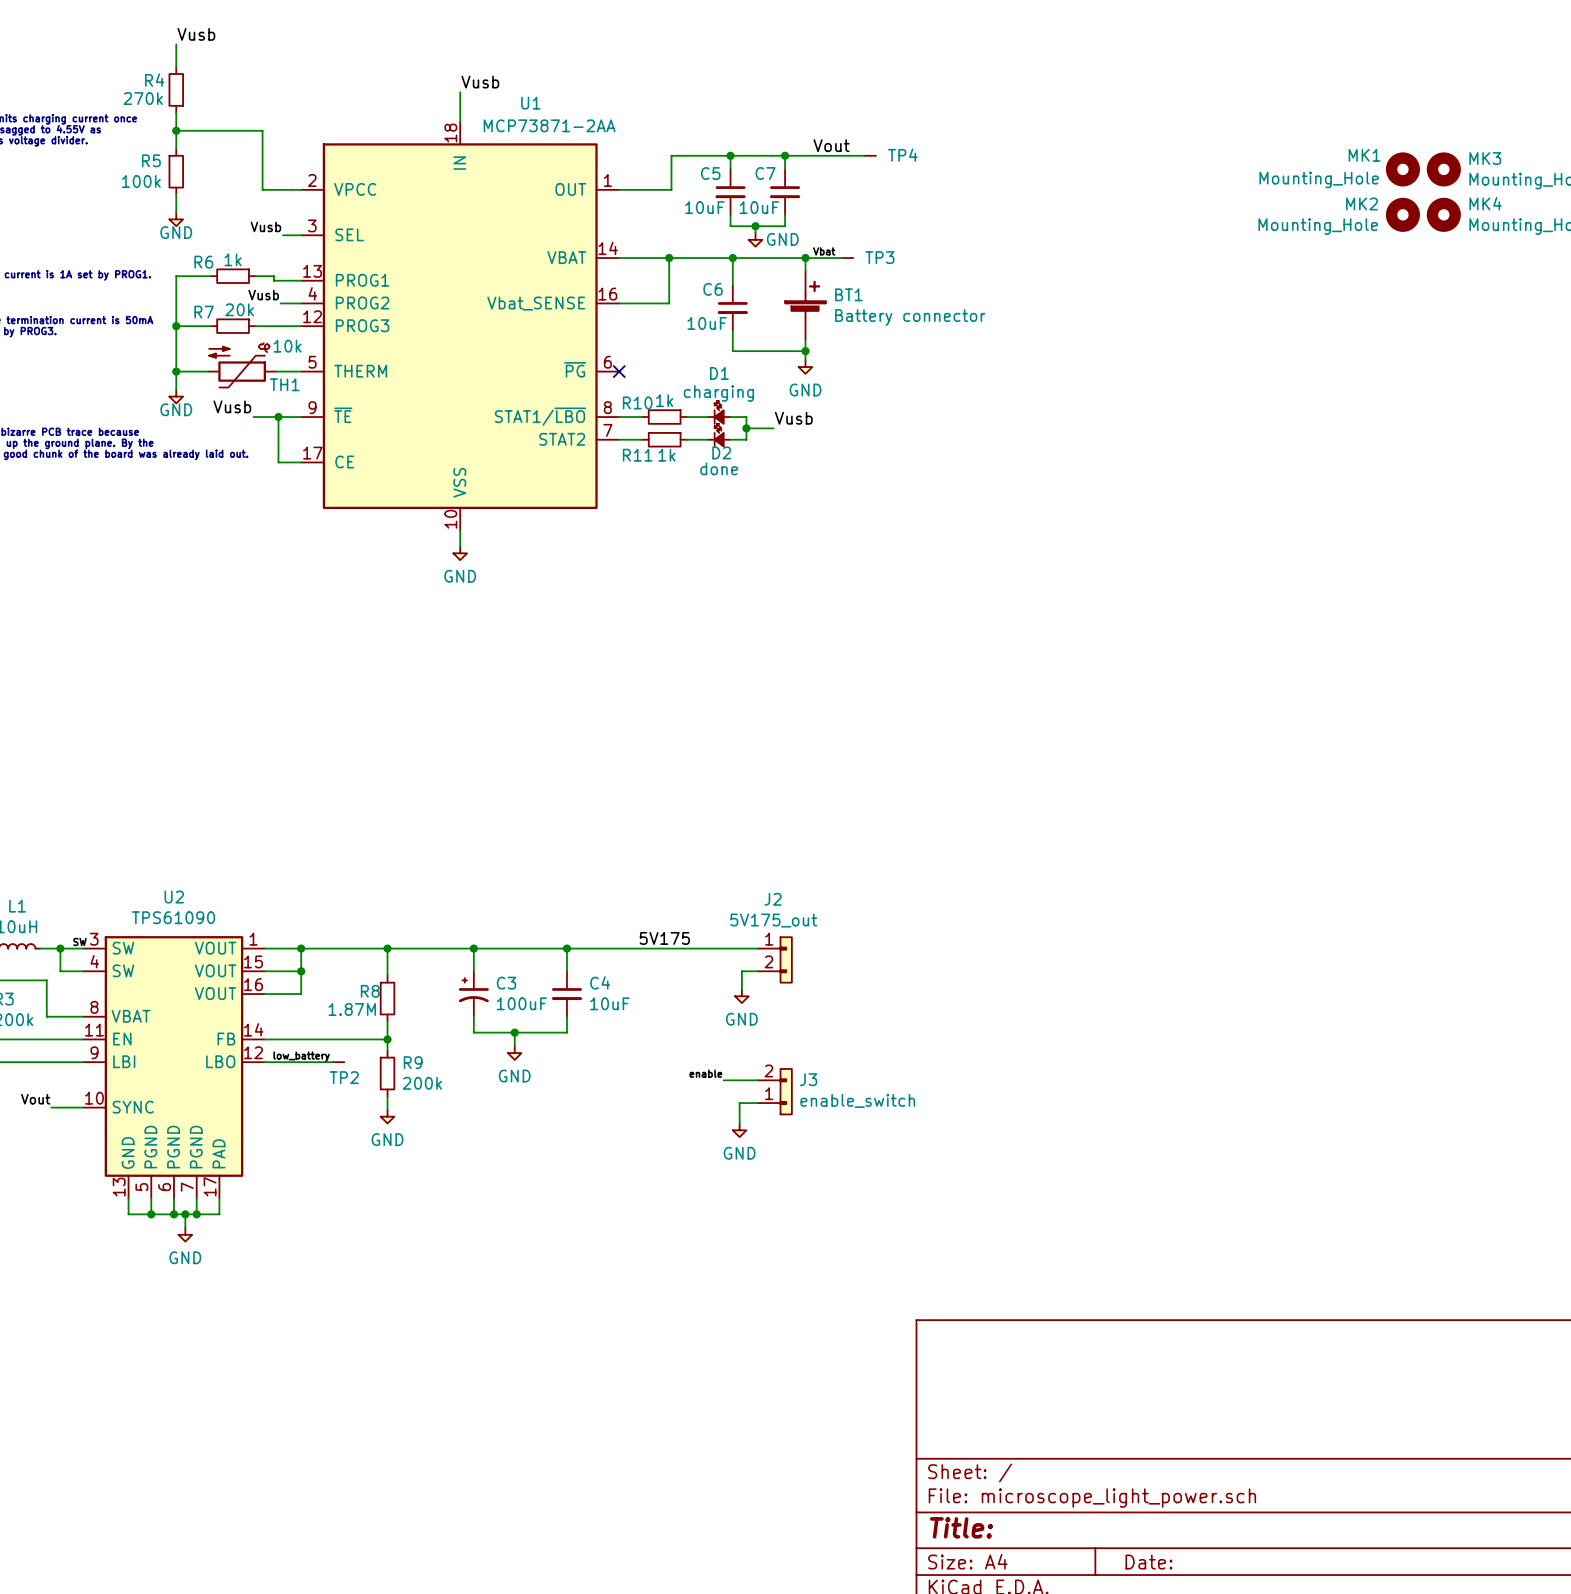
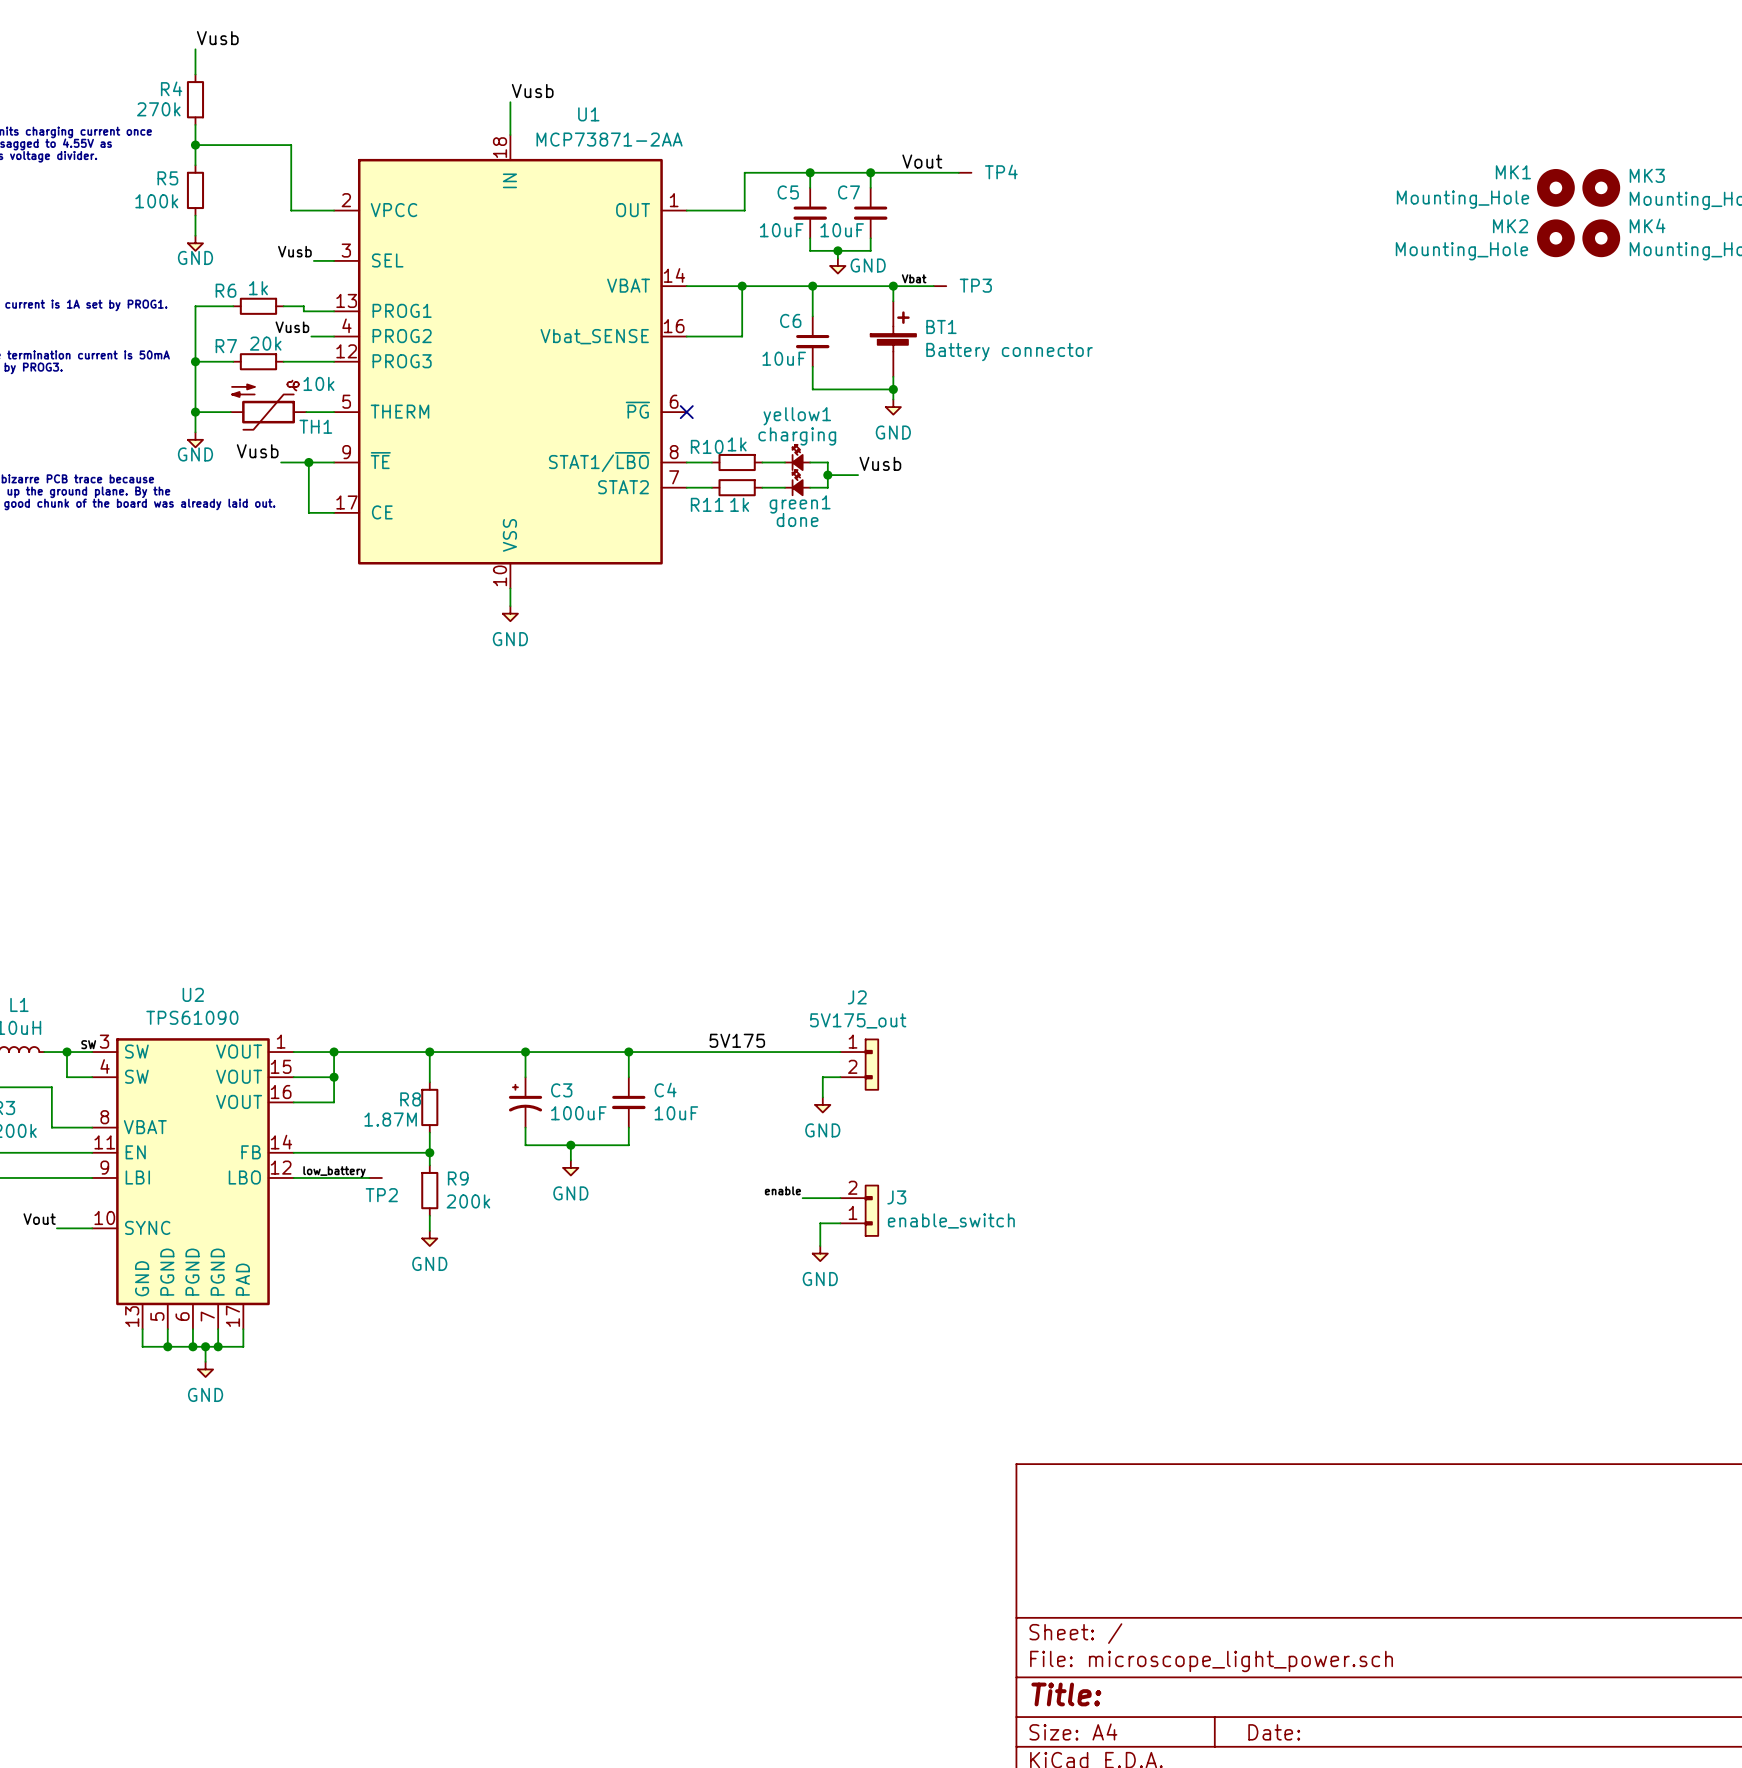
D1 name: D1 (719, 373) -> yellow1 (797, 416)
D2 name: D2 (721, 452) -> green1 (800, 504)

